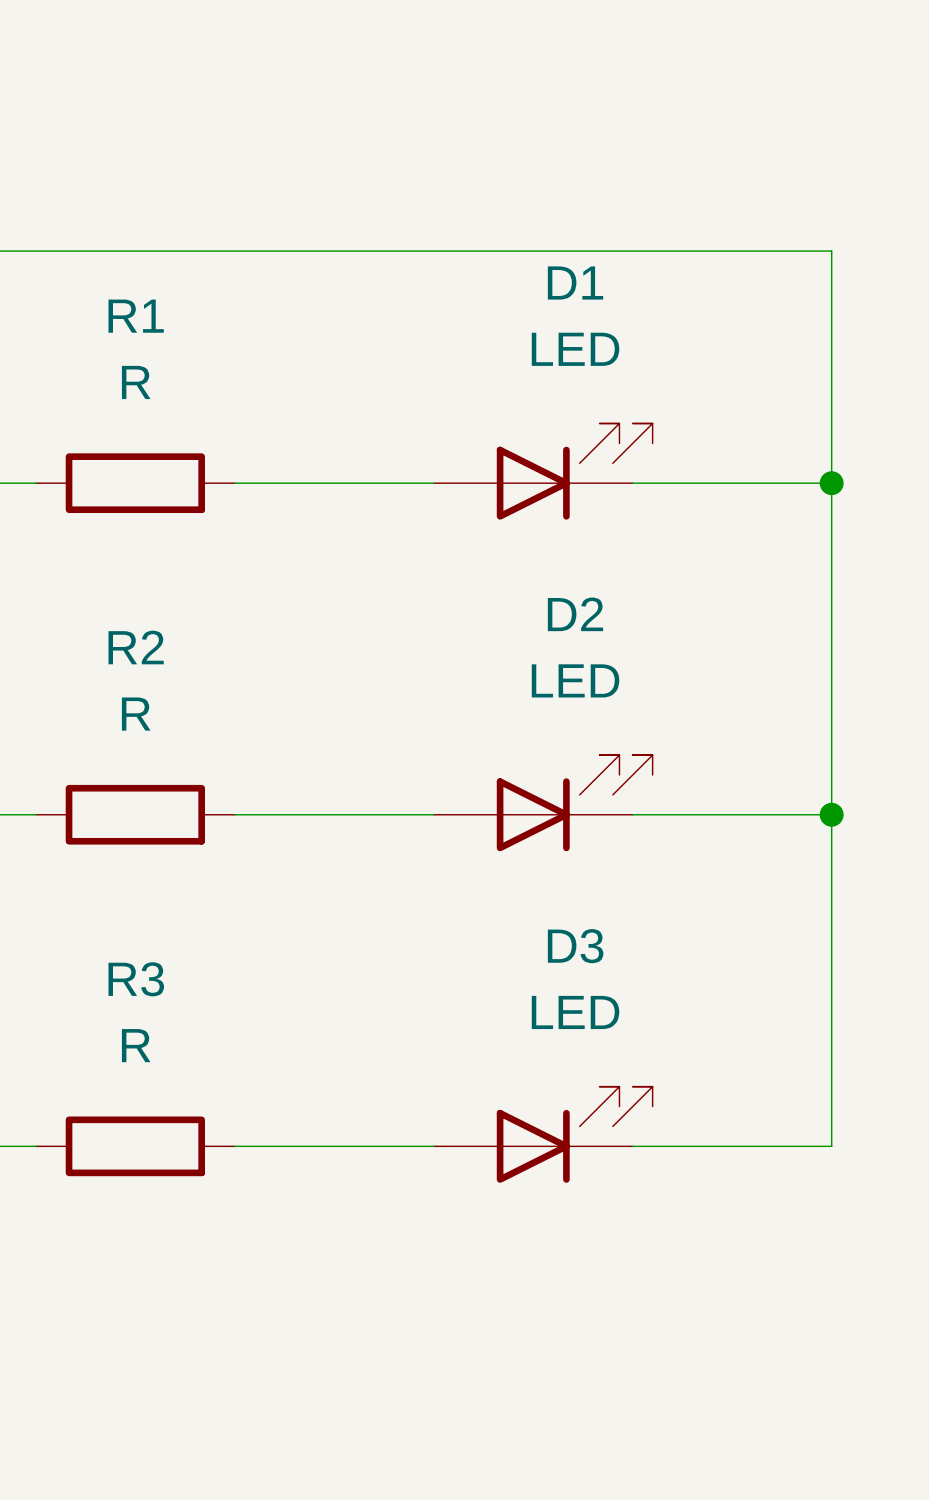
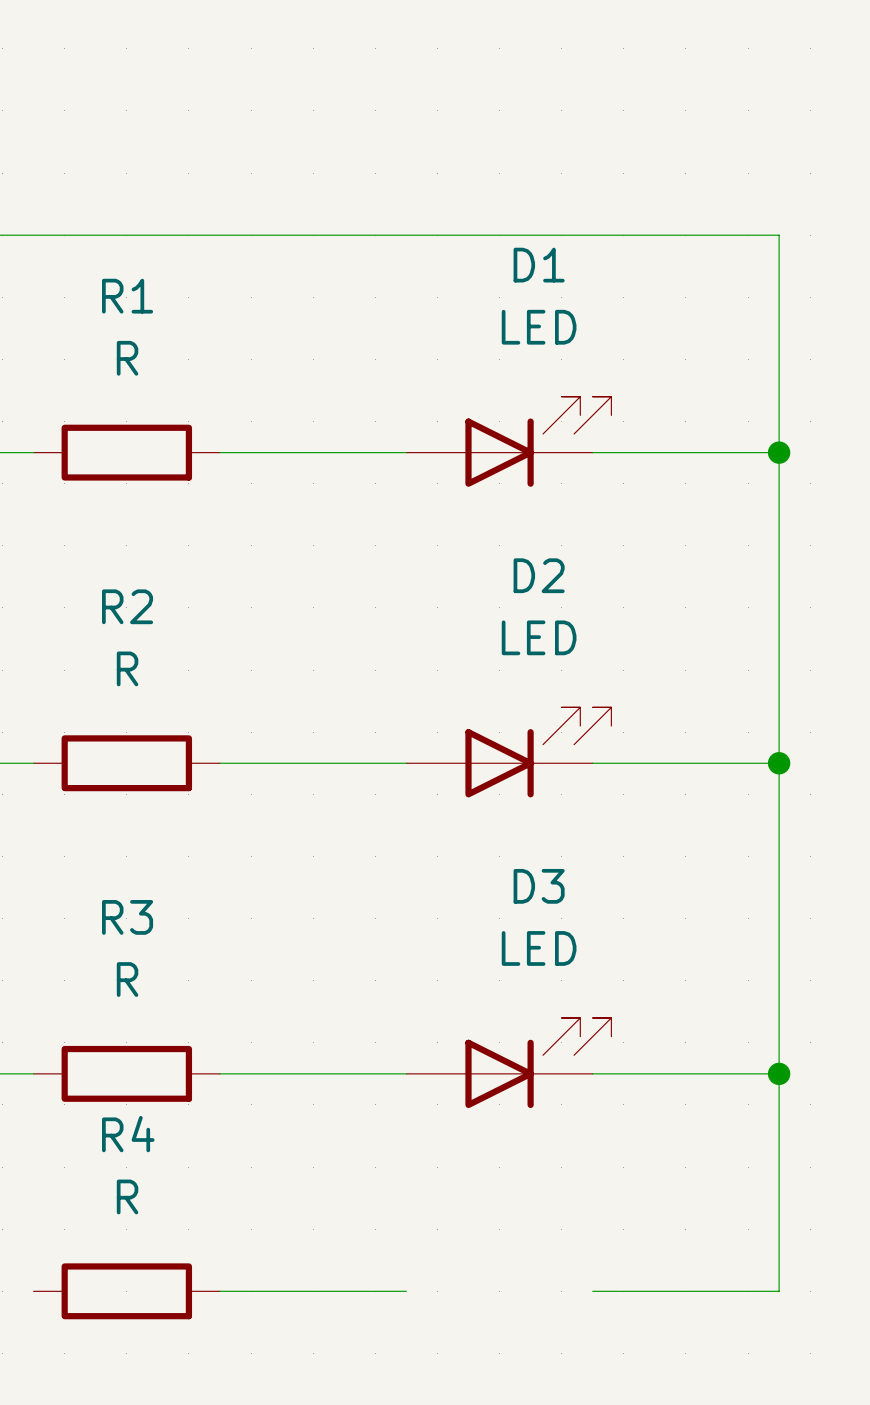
wire: none -> (779, 1073) (779, 1291) (592, 1291)
junction: none -> (779, 1073)
R4: none -> R (126, 1291)
wire: none -> (219, 1291) (406, 1291)

